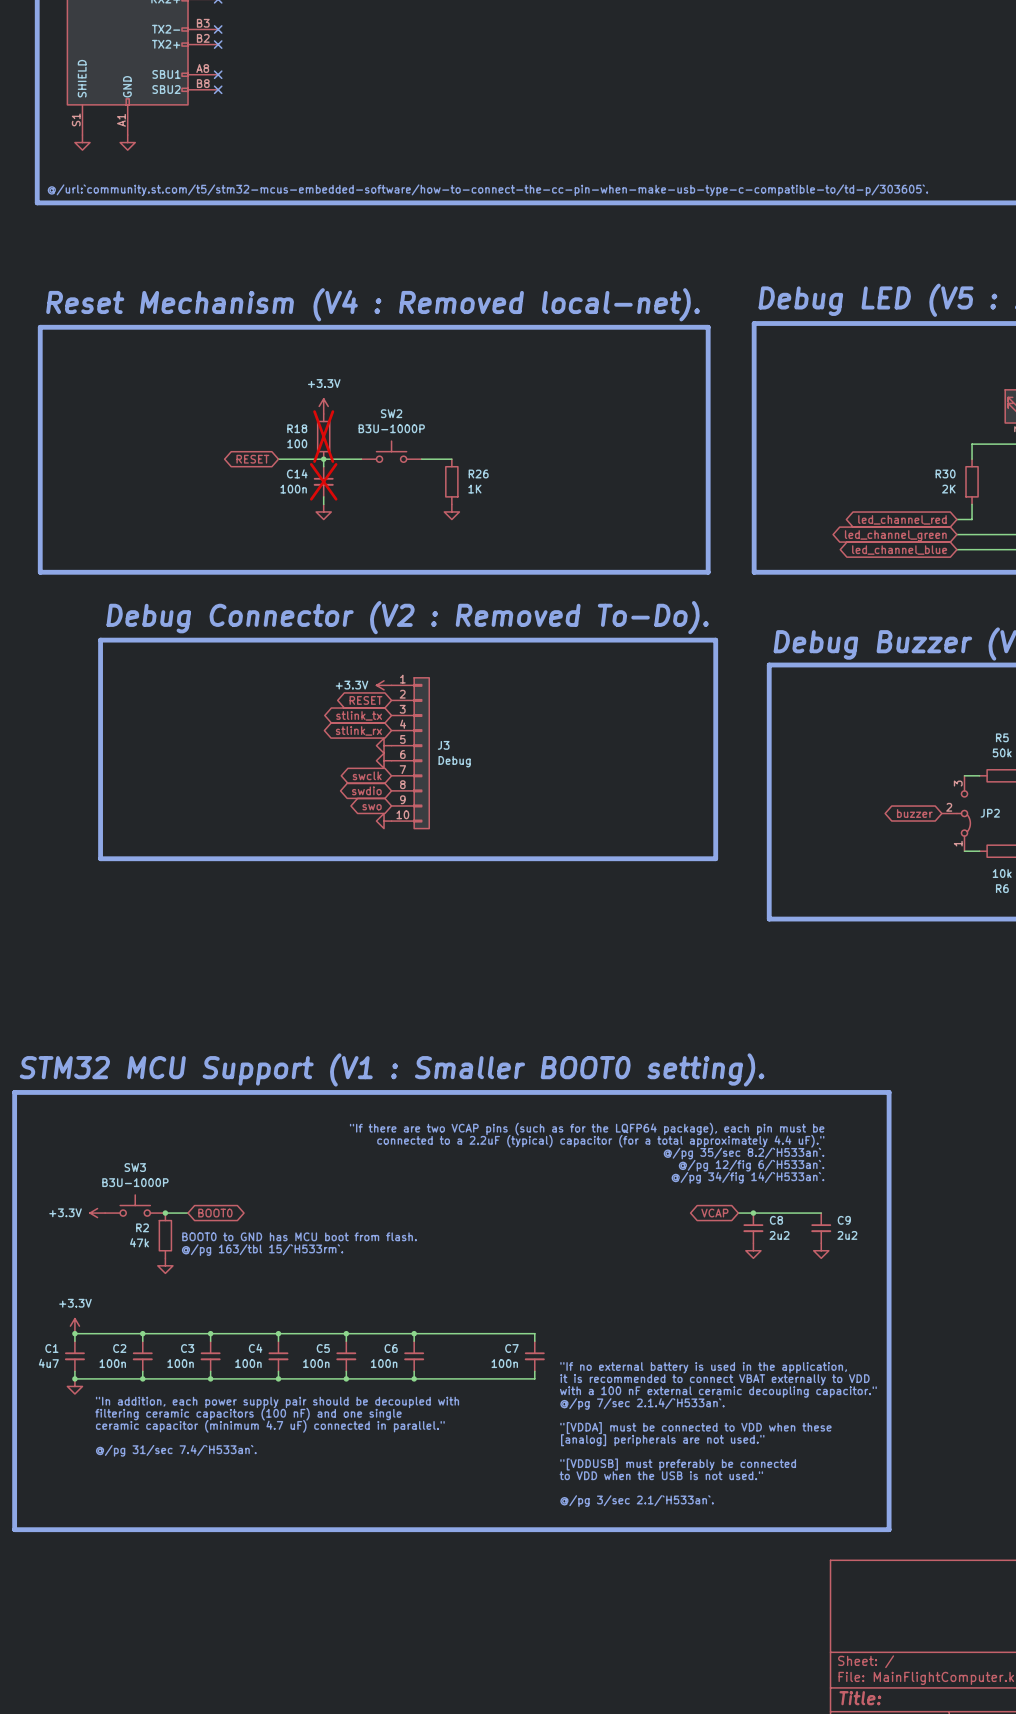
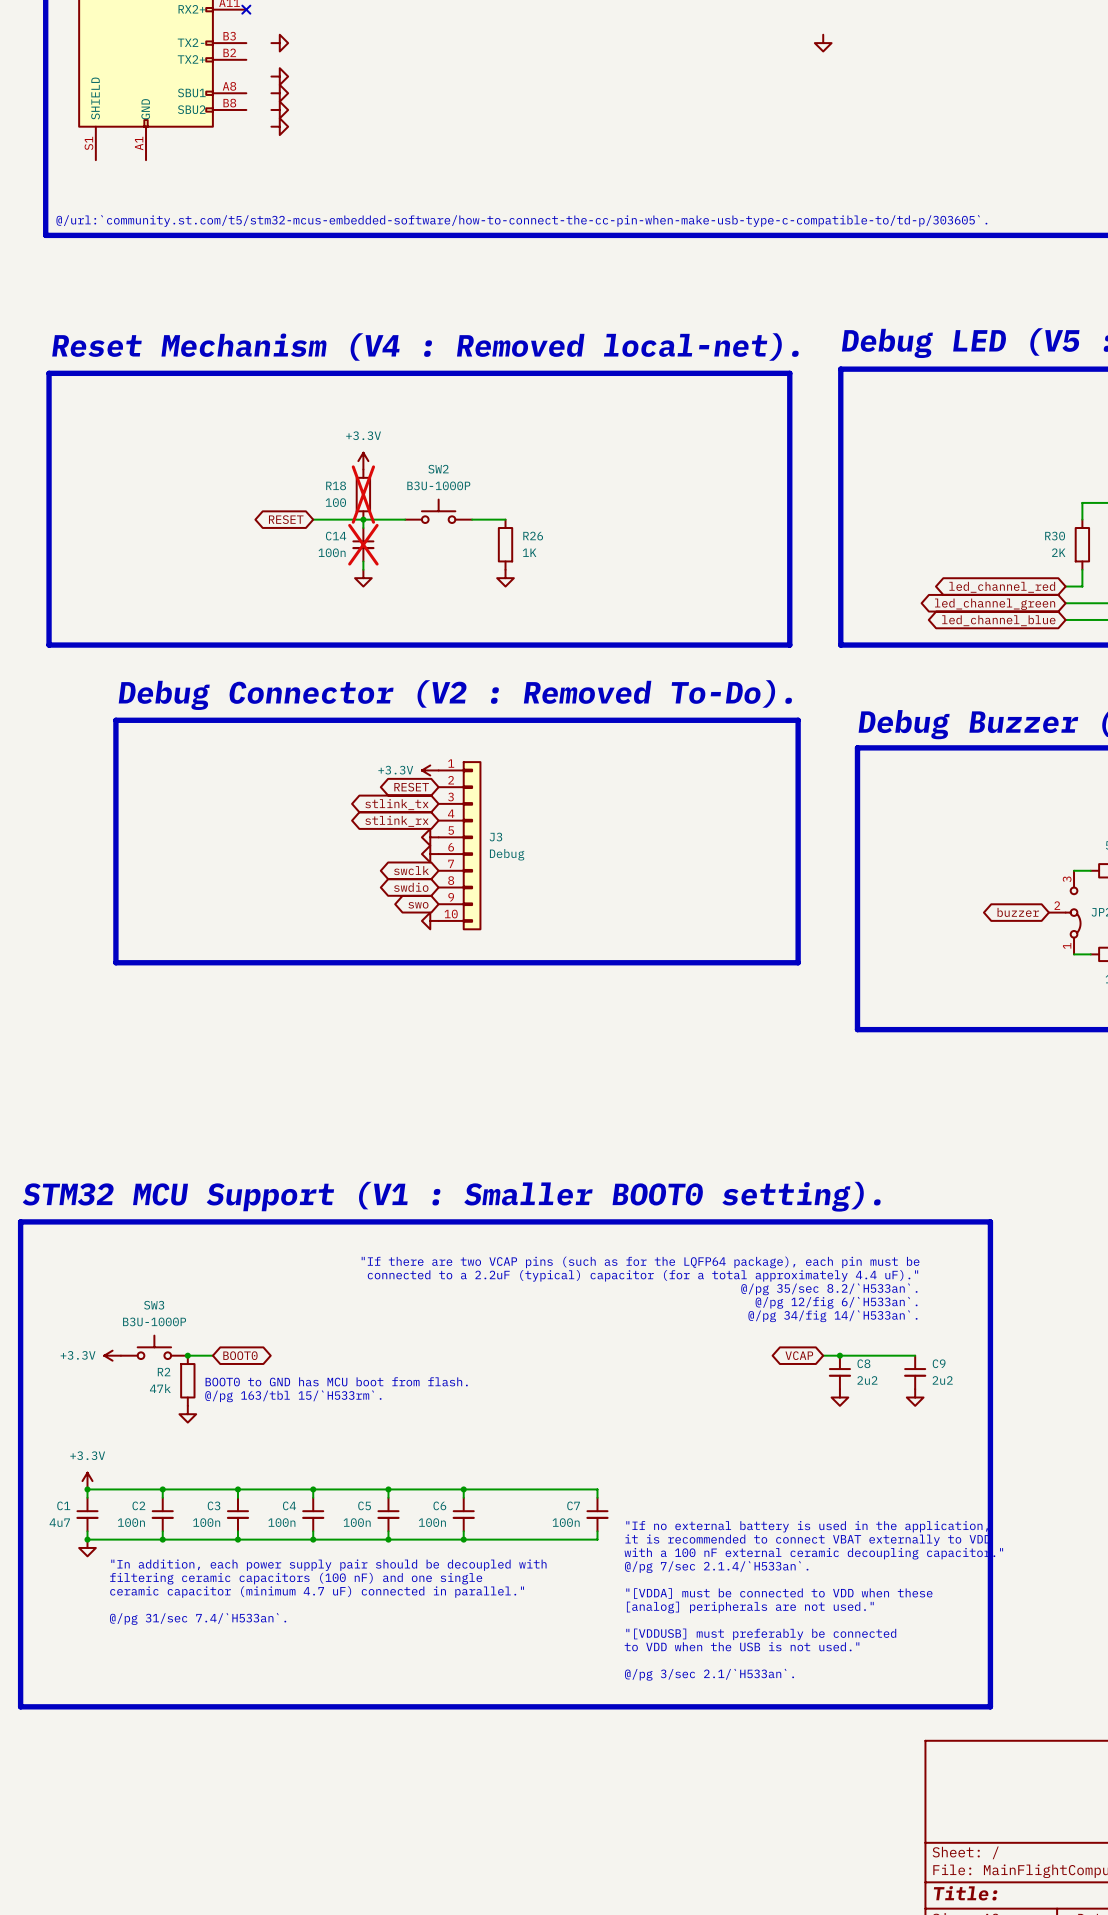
no-connect mark: (218, 29) -> none
power symbol: none -> (279, 43)
power symbol: none -> (823, 43)
no-connect mark: (218, 44) -> none
power symbol: none -> (279, 76)
no-connect mark: (218, 74) -> none
power symbol: none -> (279, 93)
no-connect mark: (218, 89) -> none
power symbol: none -> (279, 109)
power symbol: none -> (279, 126)
power symbol: (82, 142) -> none
power symbol: (127, 142) -> none

